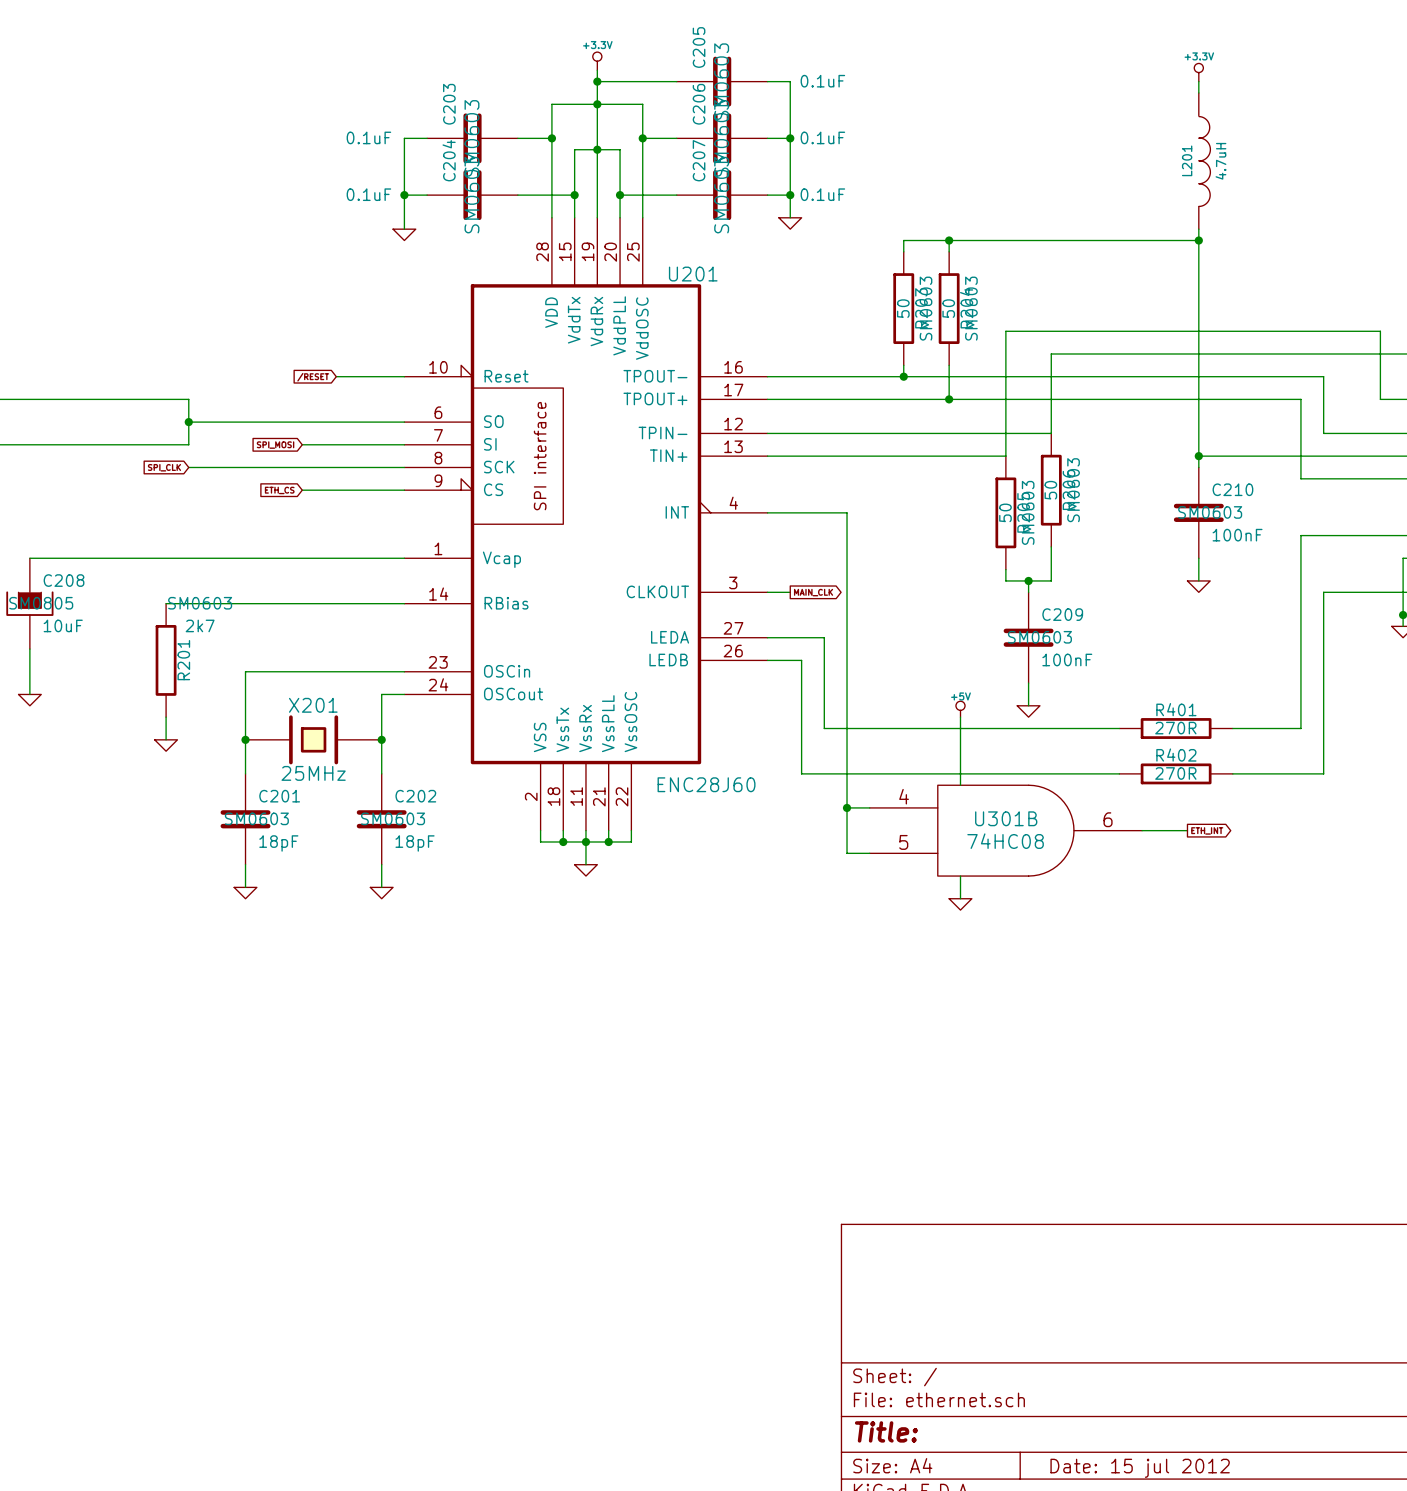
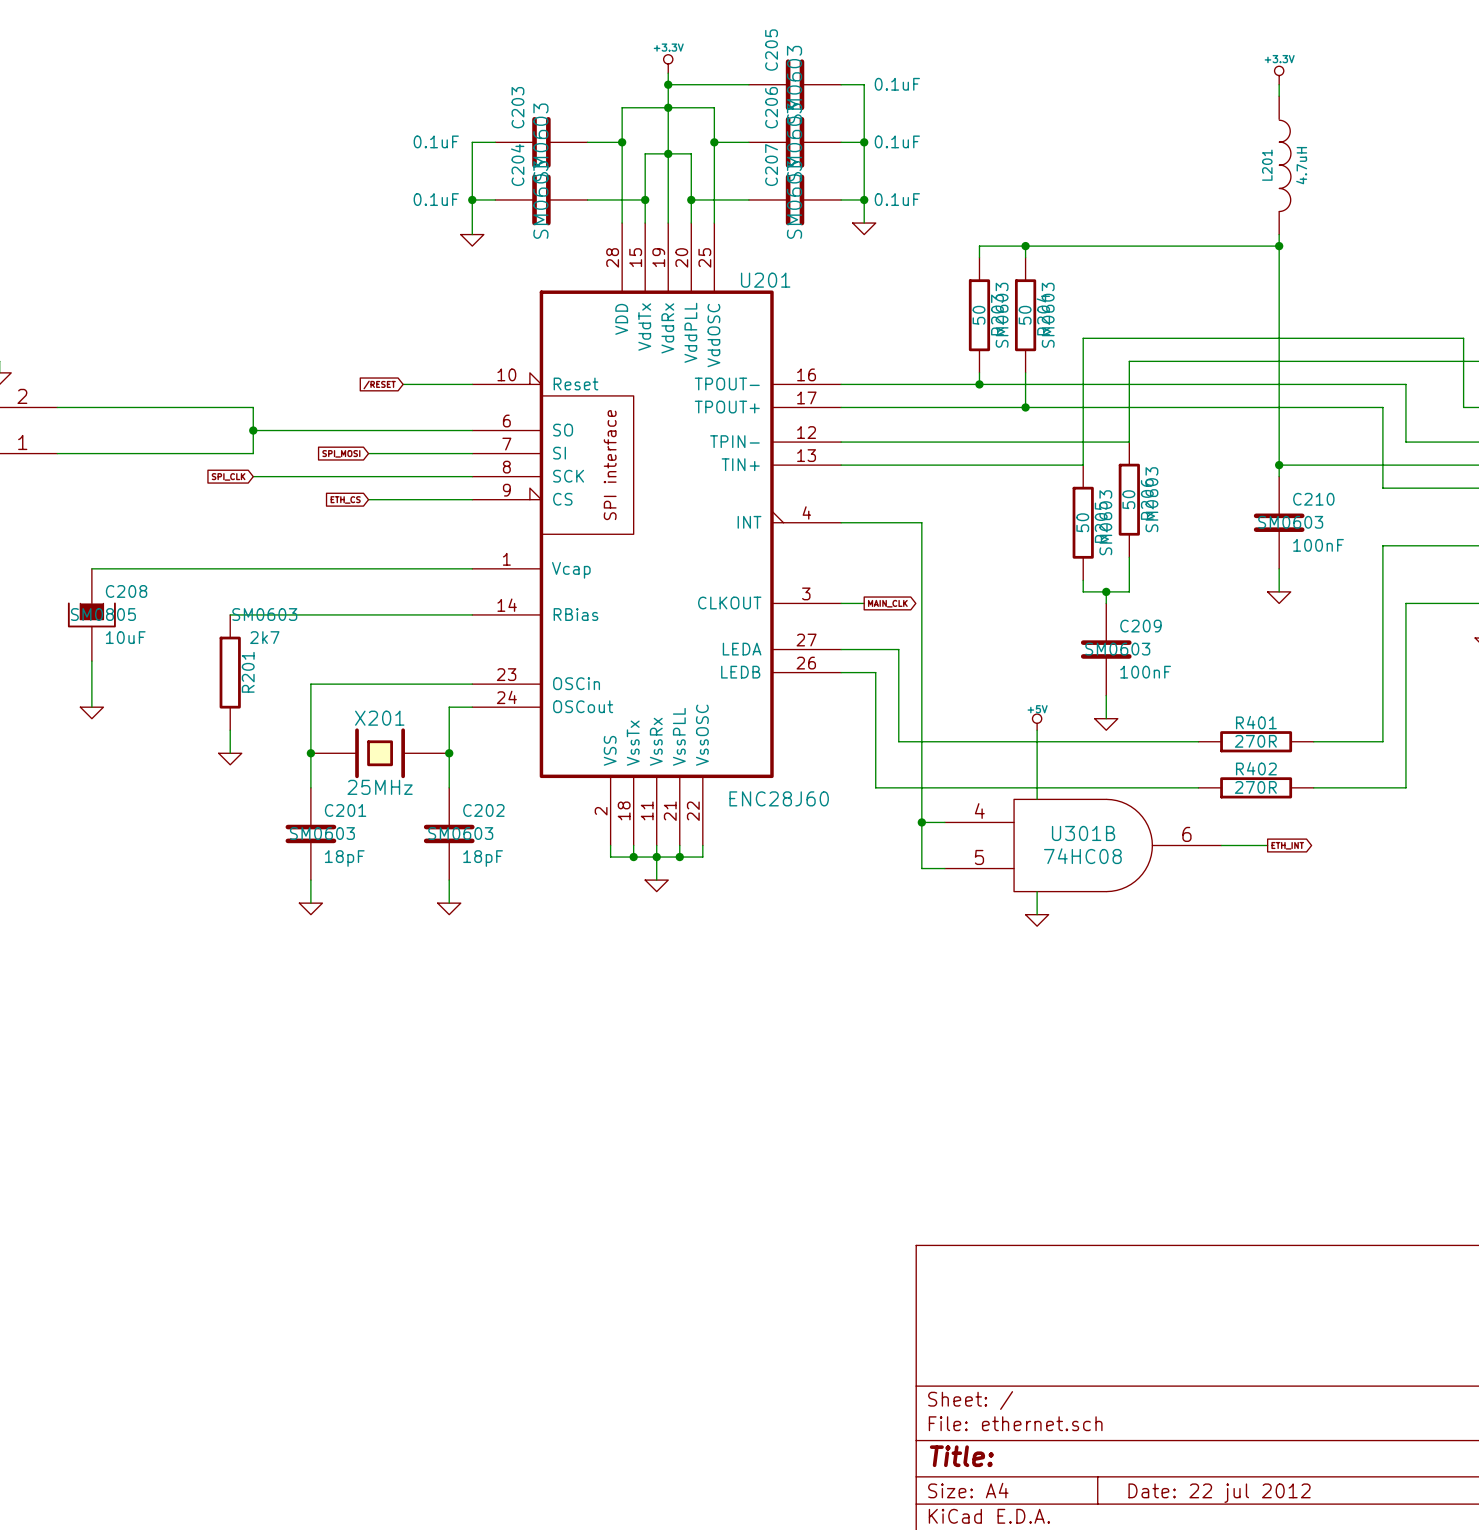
title block: Date: 15 jul 2012 (1140, 1468) -> Date: 22 jul 2012 (1219, 1493)

